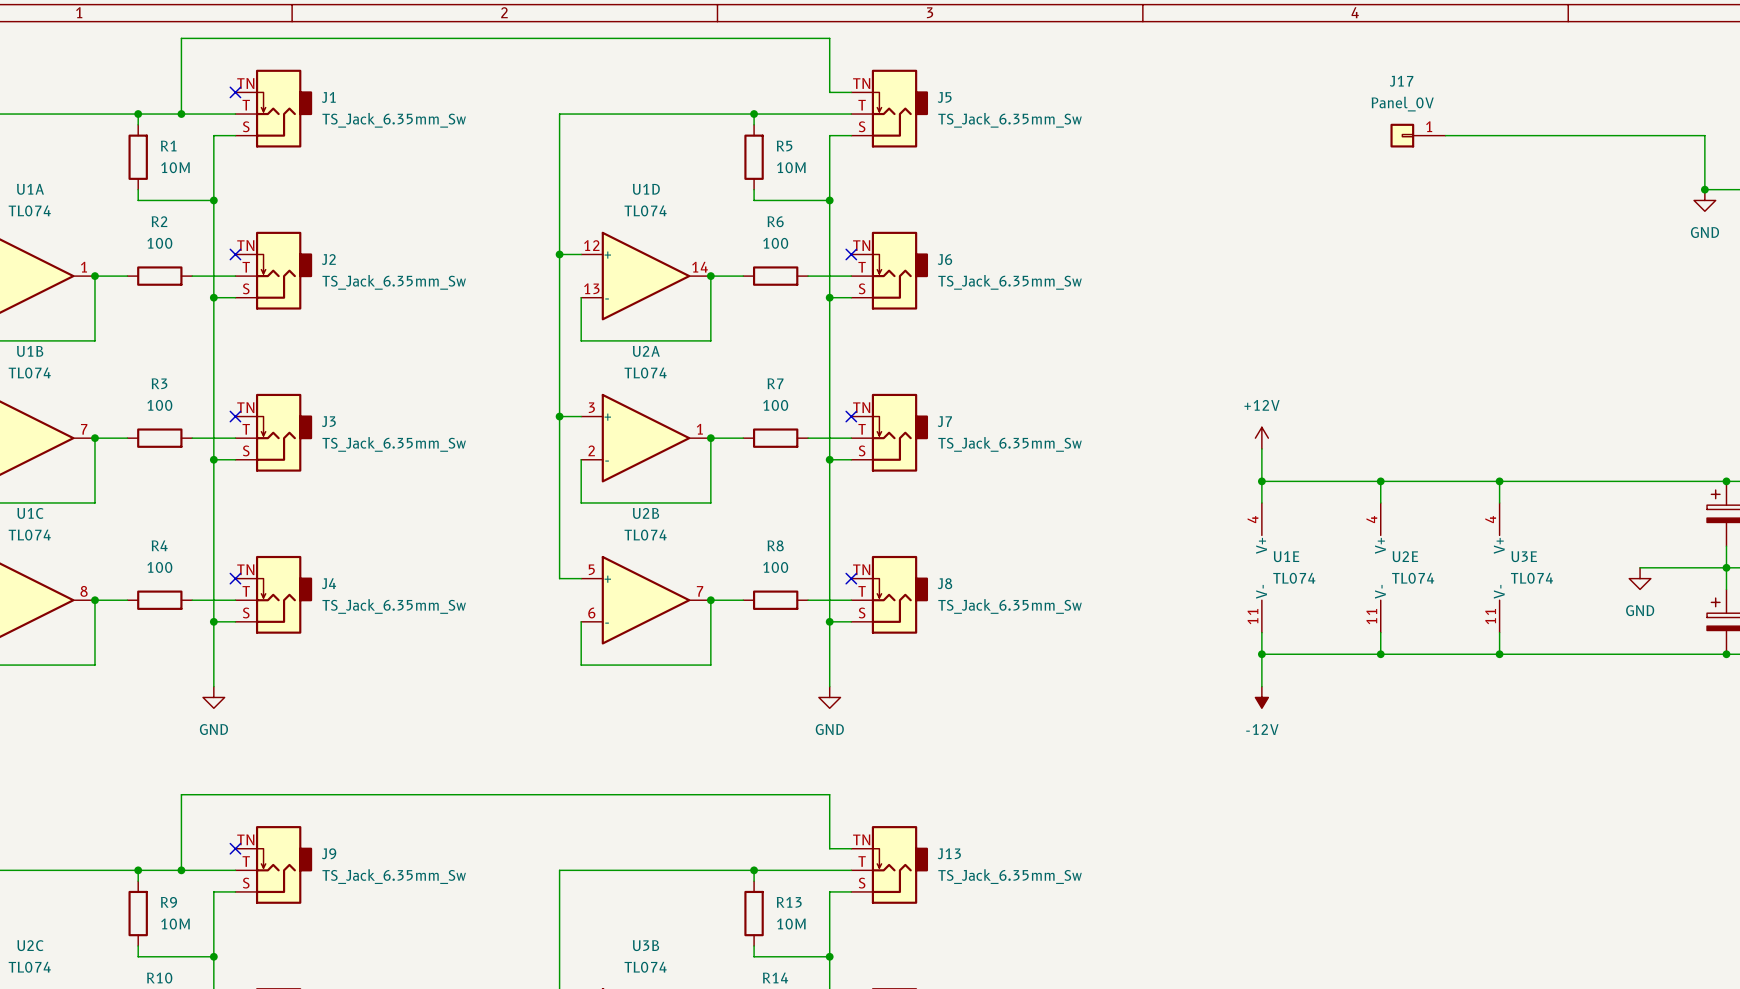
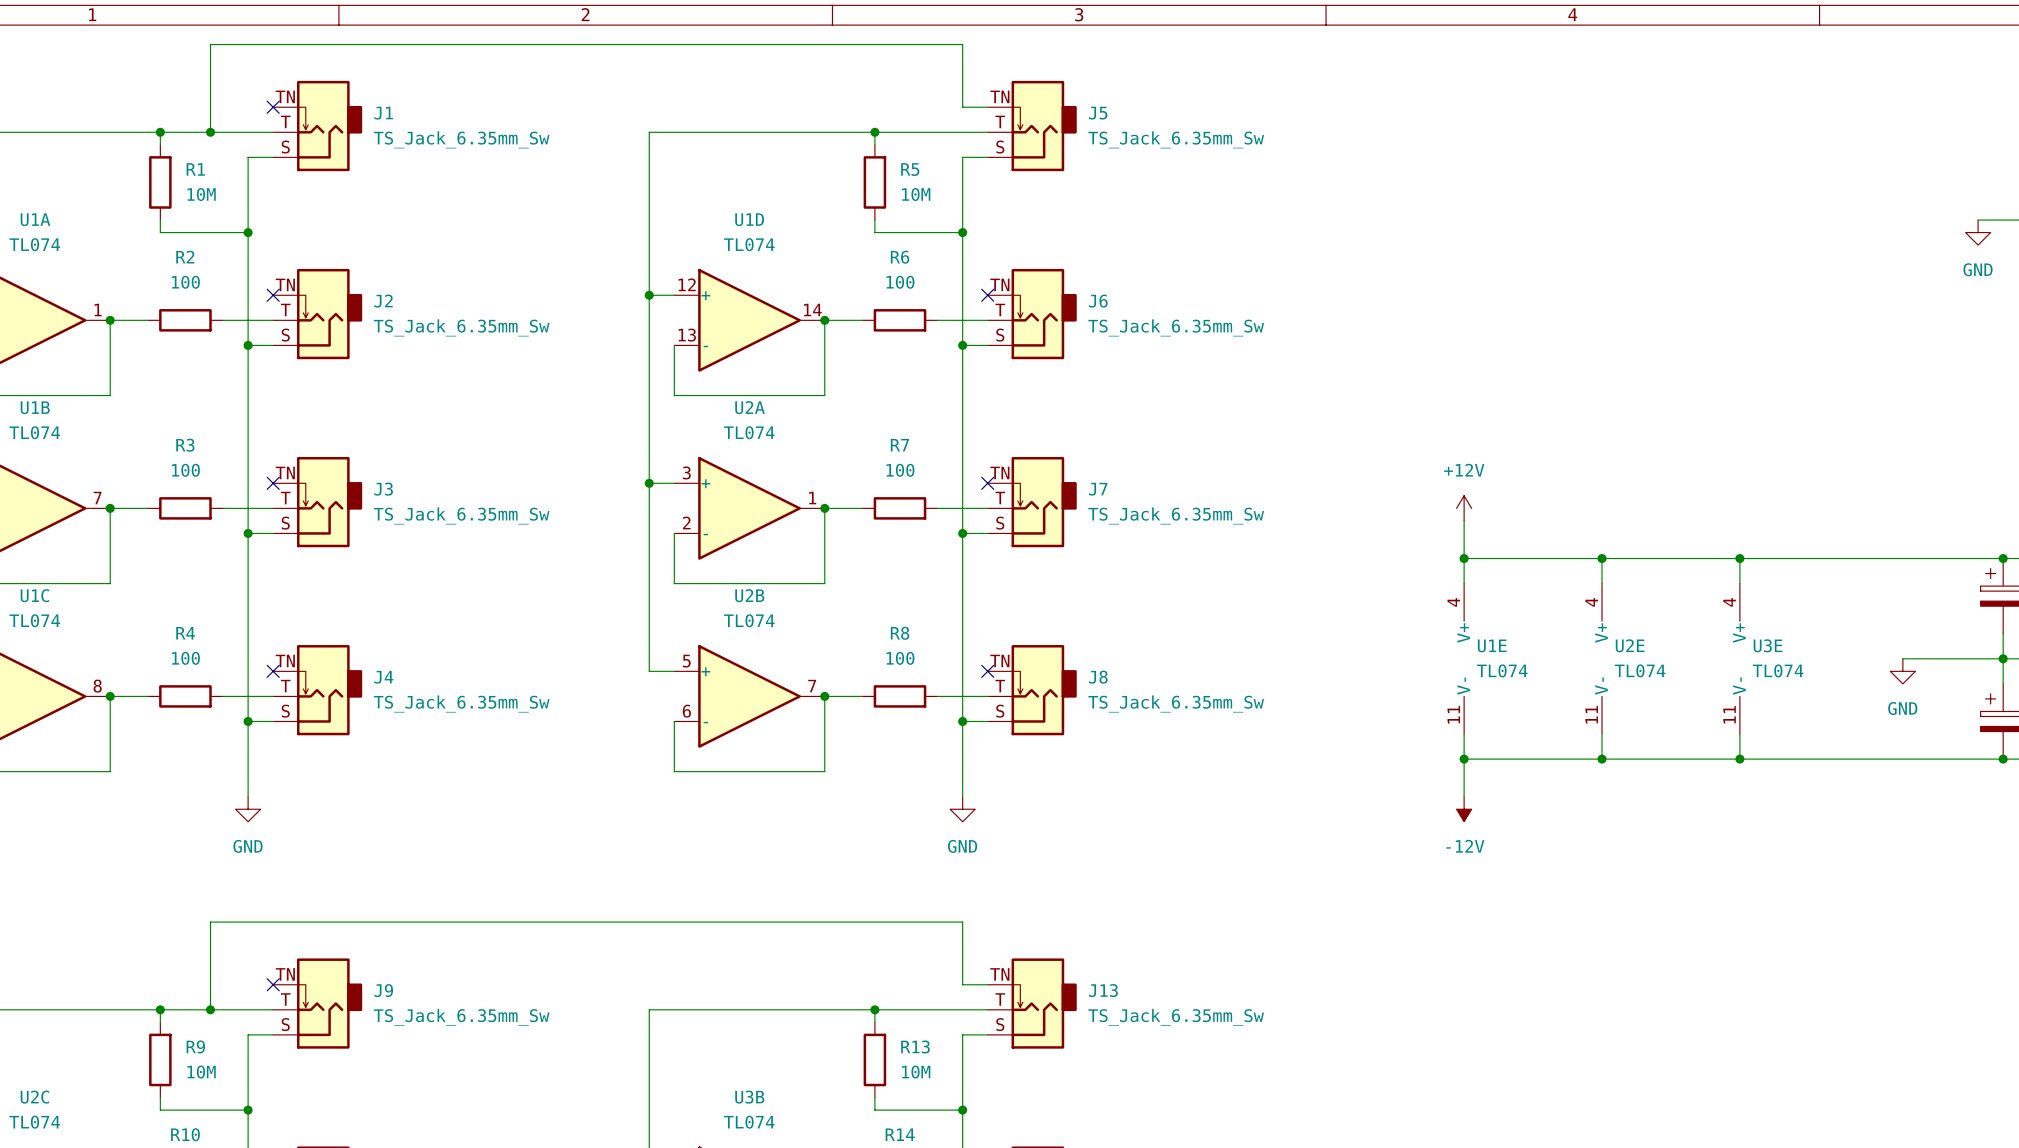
J17: Panel_0V (1418, 135) -> none
wire: (1445, 135) (1704, 135) (1704, 189) -> none
junction: (1704, 189) -> none

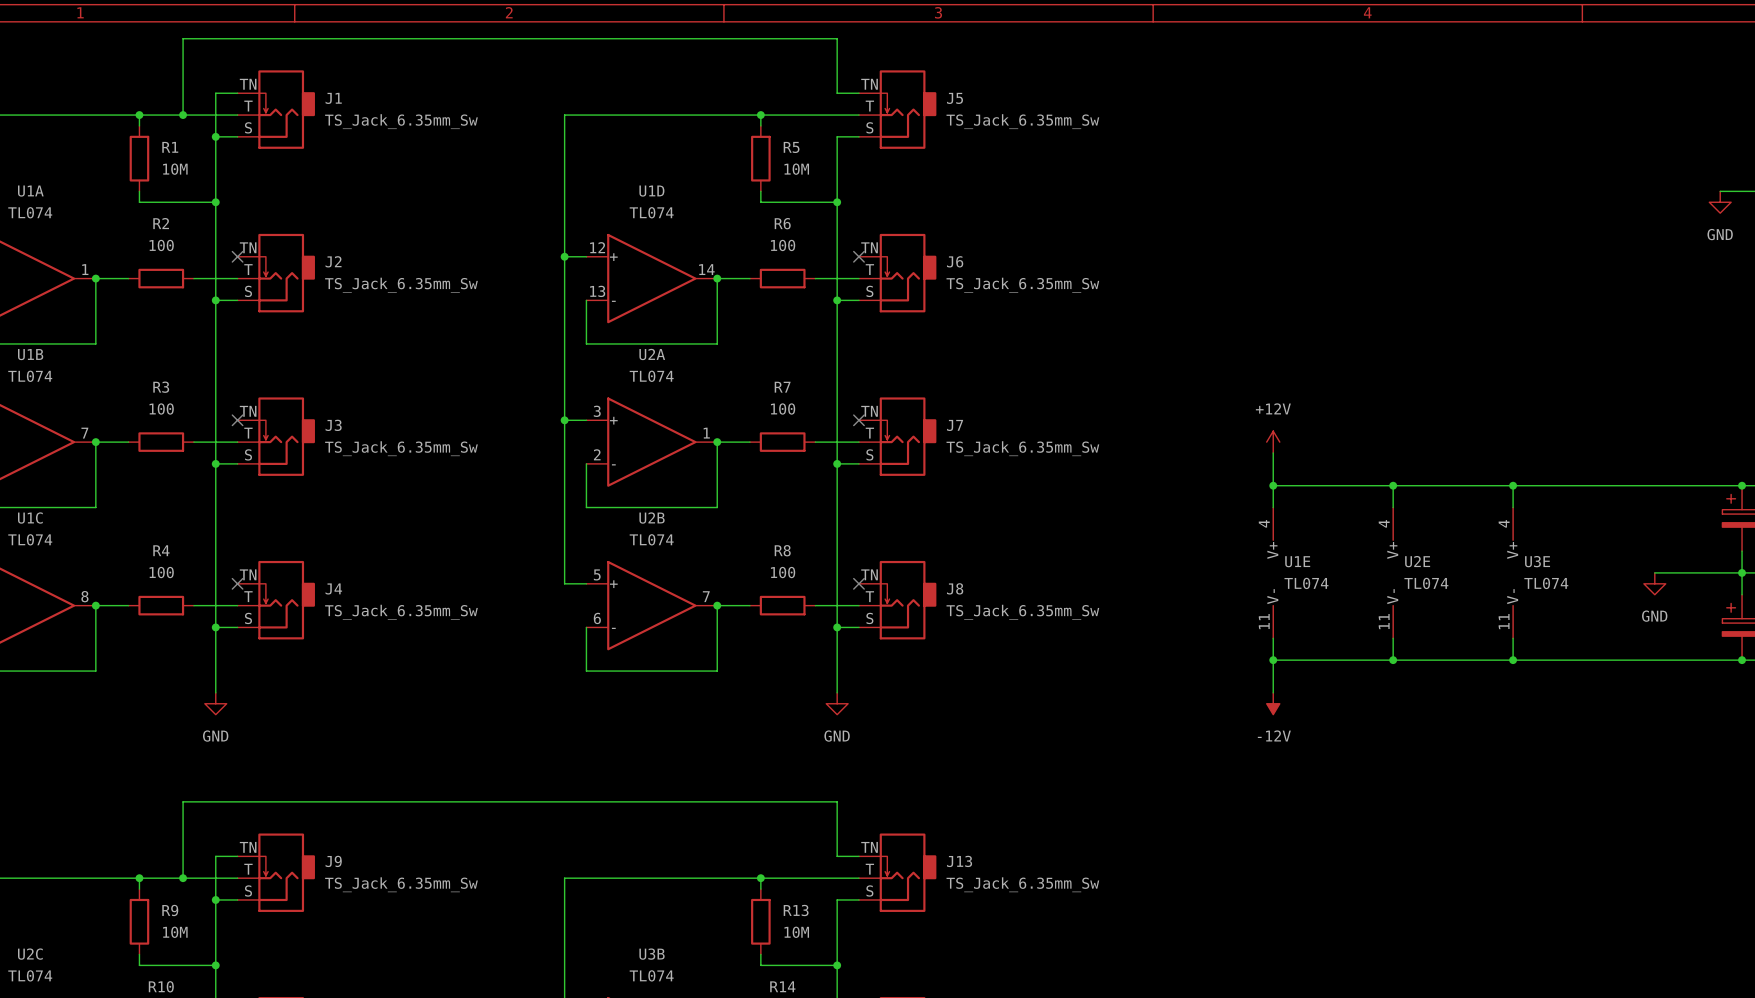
wire: none -> (237, 93) (215, 93) (215, 136)
no-connect mark: (273, 107) -> none
junction: none -> (215, 136)
wire: none -> (237, 856) (215, 856) (215, 899)
no-connect mark: (273, 984) -> none
junction: none -> (215, 899)

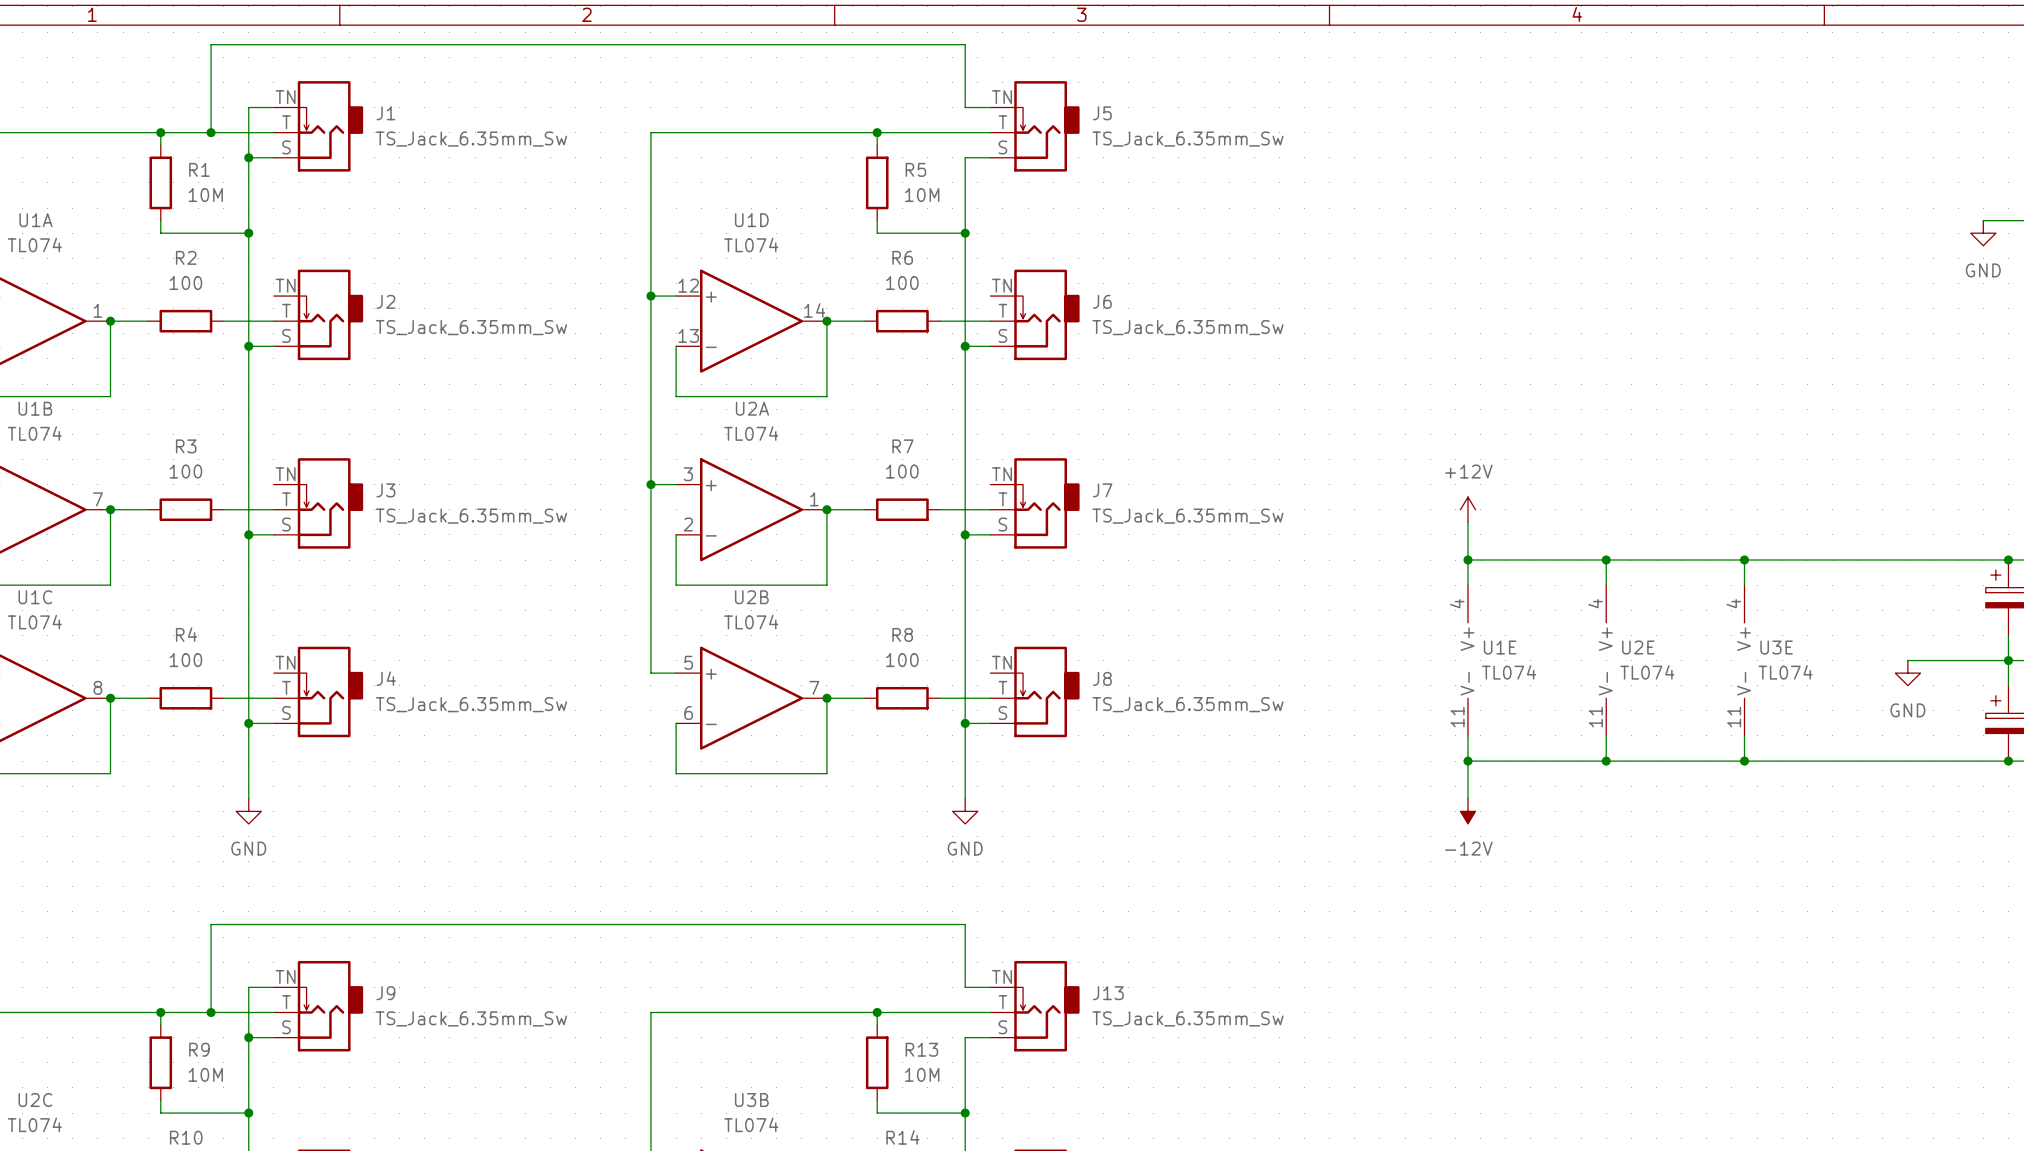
no-connect mark: (237, 256) -> none
no-connect mark: (858, 256) -> none
no-connect mark: (237, 420) -> none
no-connect mark: (858, 420) -> none
no-connect mark: (237, 583) -> none
no-connect mark: (858, 583) -> none

